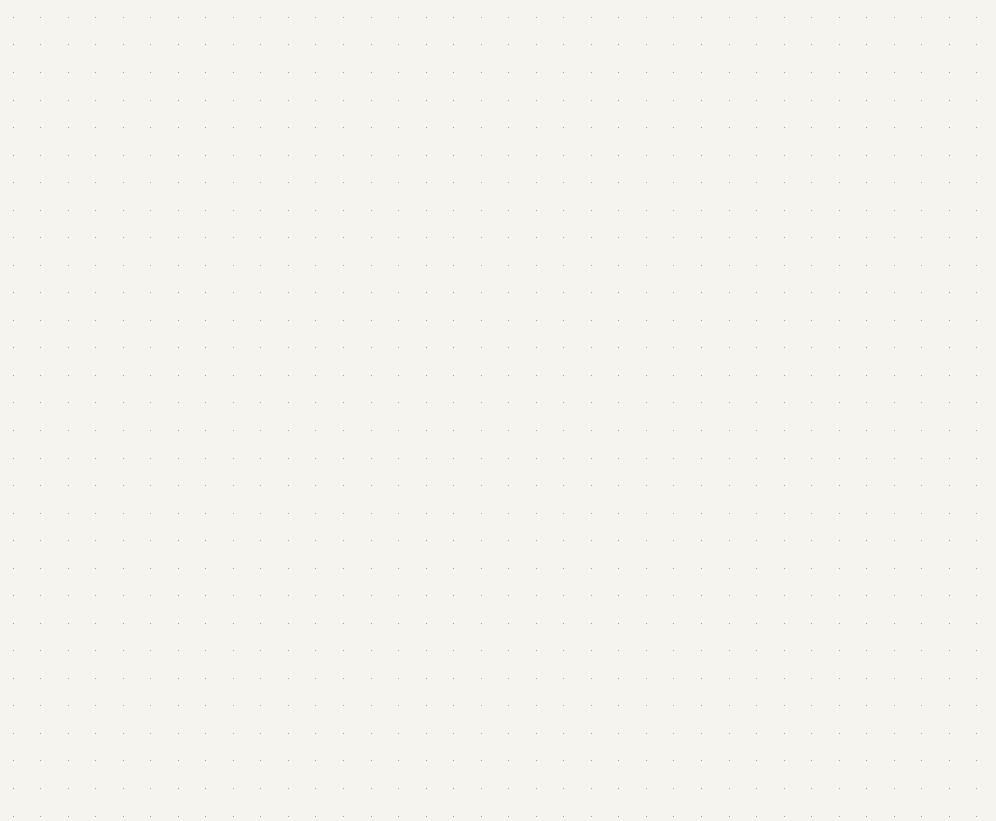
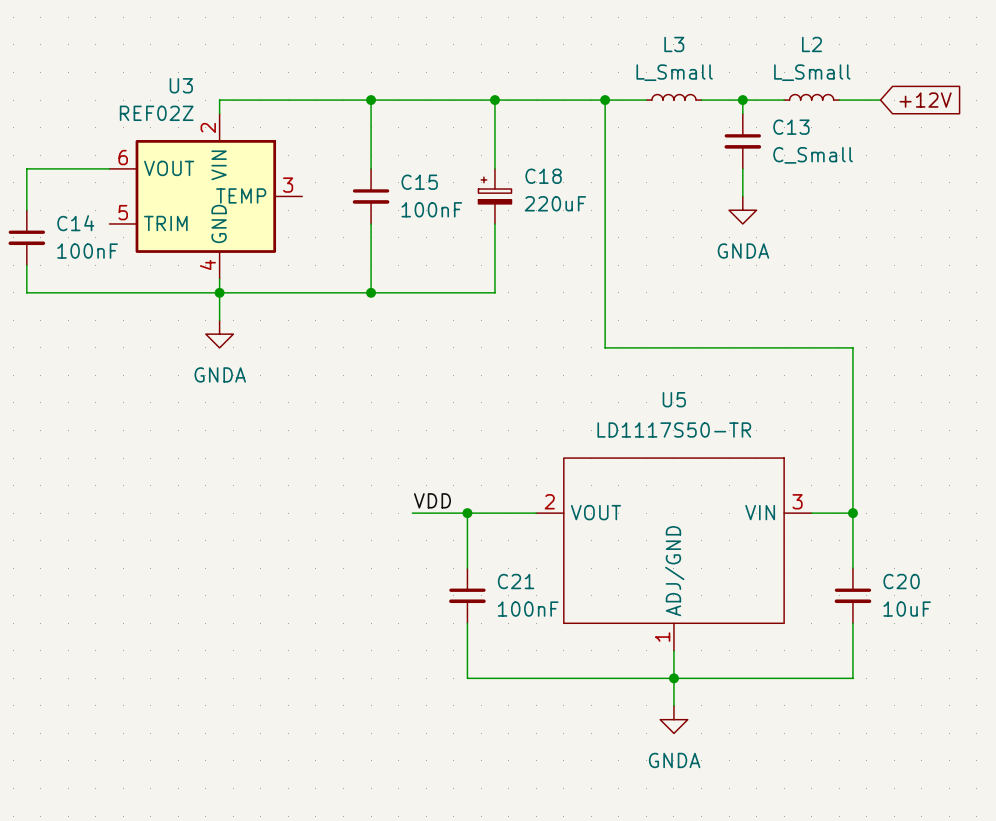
L3: none -> L_Small (673, 97)
L2: none -> L_Small (811, 97)
wire: none -> (371, 100) (371, 168)
junction: none -> (371, 100)
wire: none -> (494, 100) (494, 168)
junction: none -> (494, 100)
wire: none -> (605, 100) (605, 347) (852, 347) (852, 568)
junction: none -> (605, 100)
wire: none -> (646, 100) (219, 100) (219, 113)
wire: none -> (701, 100) (784, 100)
wire: none -> (742, 100) (742, 113)
junction: none -> (742, 100)
wire: none -> (839, 100) (880, 100)
global label: none -> +12V (925, 100)
C13: none -> C_Small (742, 141)
wire: none -> (109, 168) (26, 168) (26, 210)
wire: none -> (742, 168) (742, 196)
U3: none -> REF02Z (205, 196)
C15: none -> 100nF (371, 196)
C18: none -> 220uF (494, 196)
power symbol: none -> GNDA (742, 210)
wire: none -> (371, 223) (371, 292)
wire: none -> (494, 223) (494, 292) (26, 292) (26, 265)
C14: none -> 100nF (26, 237)
wire: none -> (219, 279) (219, 320)
junction: none -> (219, 292)
junction: none -> (371, 292)
power symbol: none -> GNDA (219, 334)
label: none -> VDD (432, 500)
wire: none -> (412, 513) (536, 513)
wire: none -> (467, 513) (467, 568)
junction: none -> (467, 513)
wire: none -> (811, 513) (852, 513)
junction: none -> (852, 513)
U5: none -> LD1117S50-TR (673, 554)
C21: none -> 100nF (467, 595)
C20: none -> 10uF (852, 595)
wire: none -> (467, 623) (467, 678) (852, 678) (852, 623)
wire: none -> (673, 650) (673, 705)
junction: none -> (673, 678)
power symbol: none -> GNDA (673, 719)

